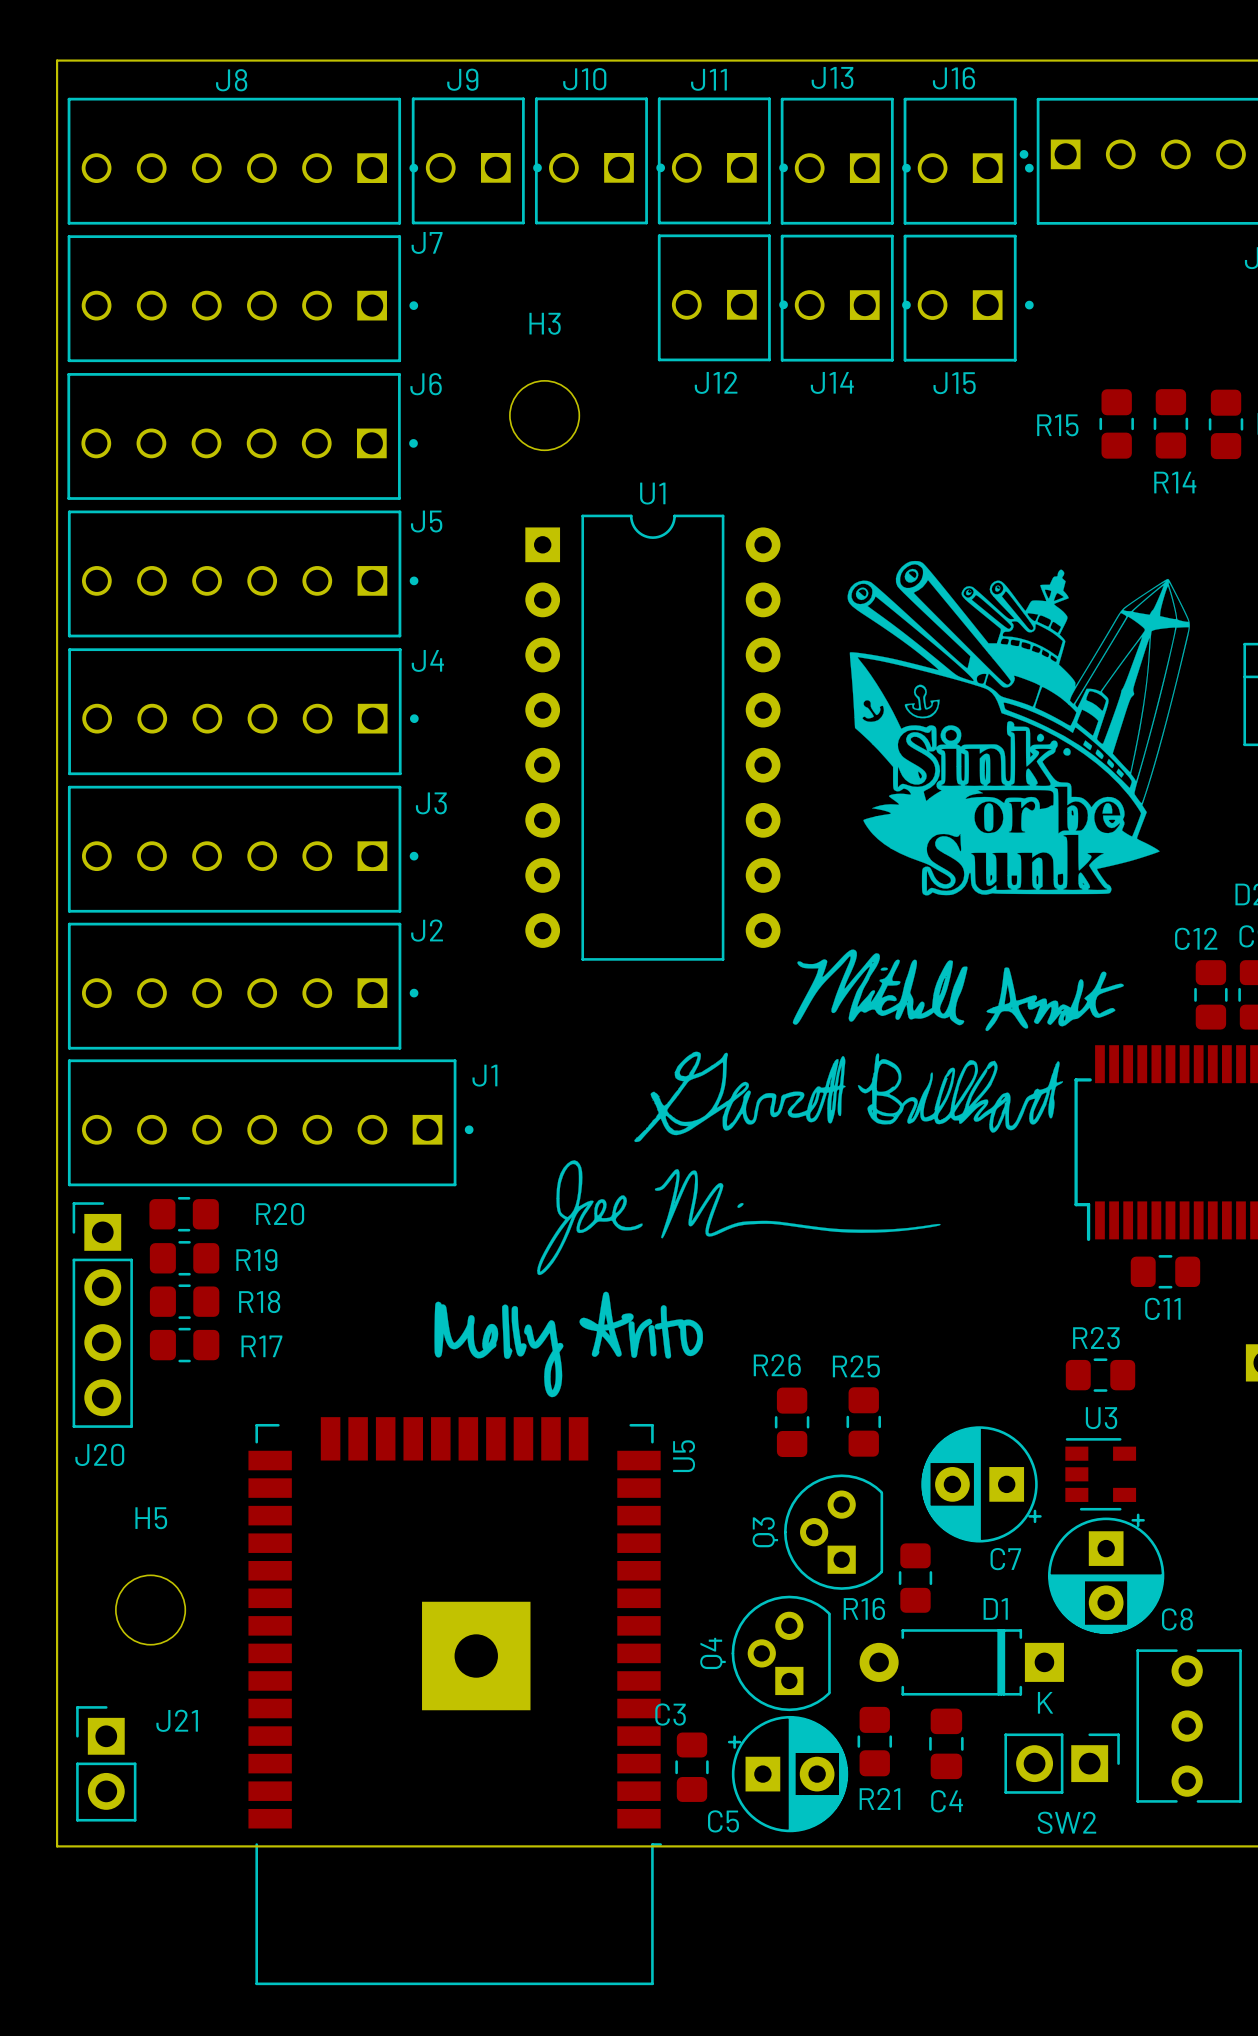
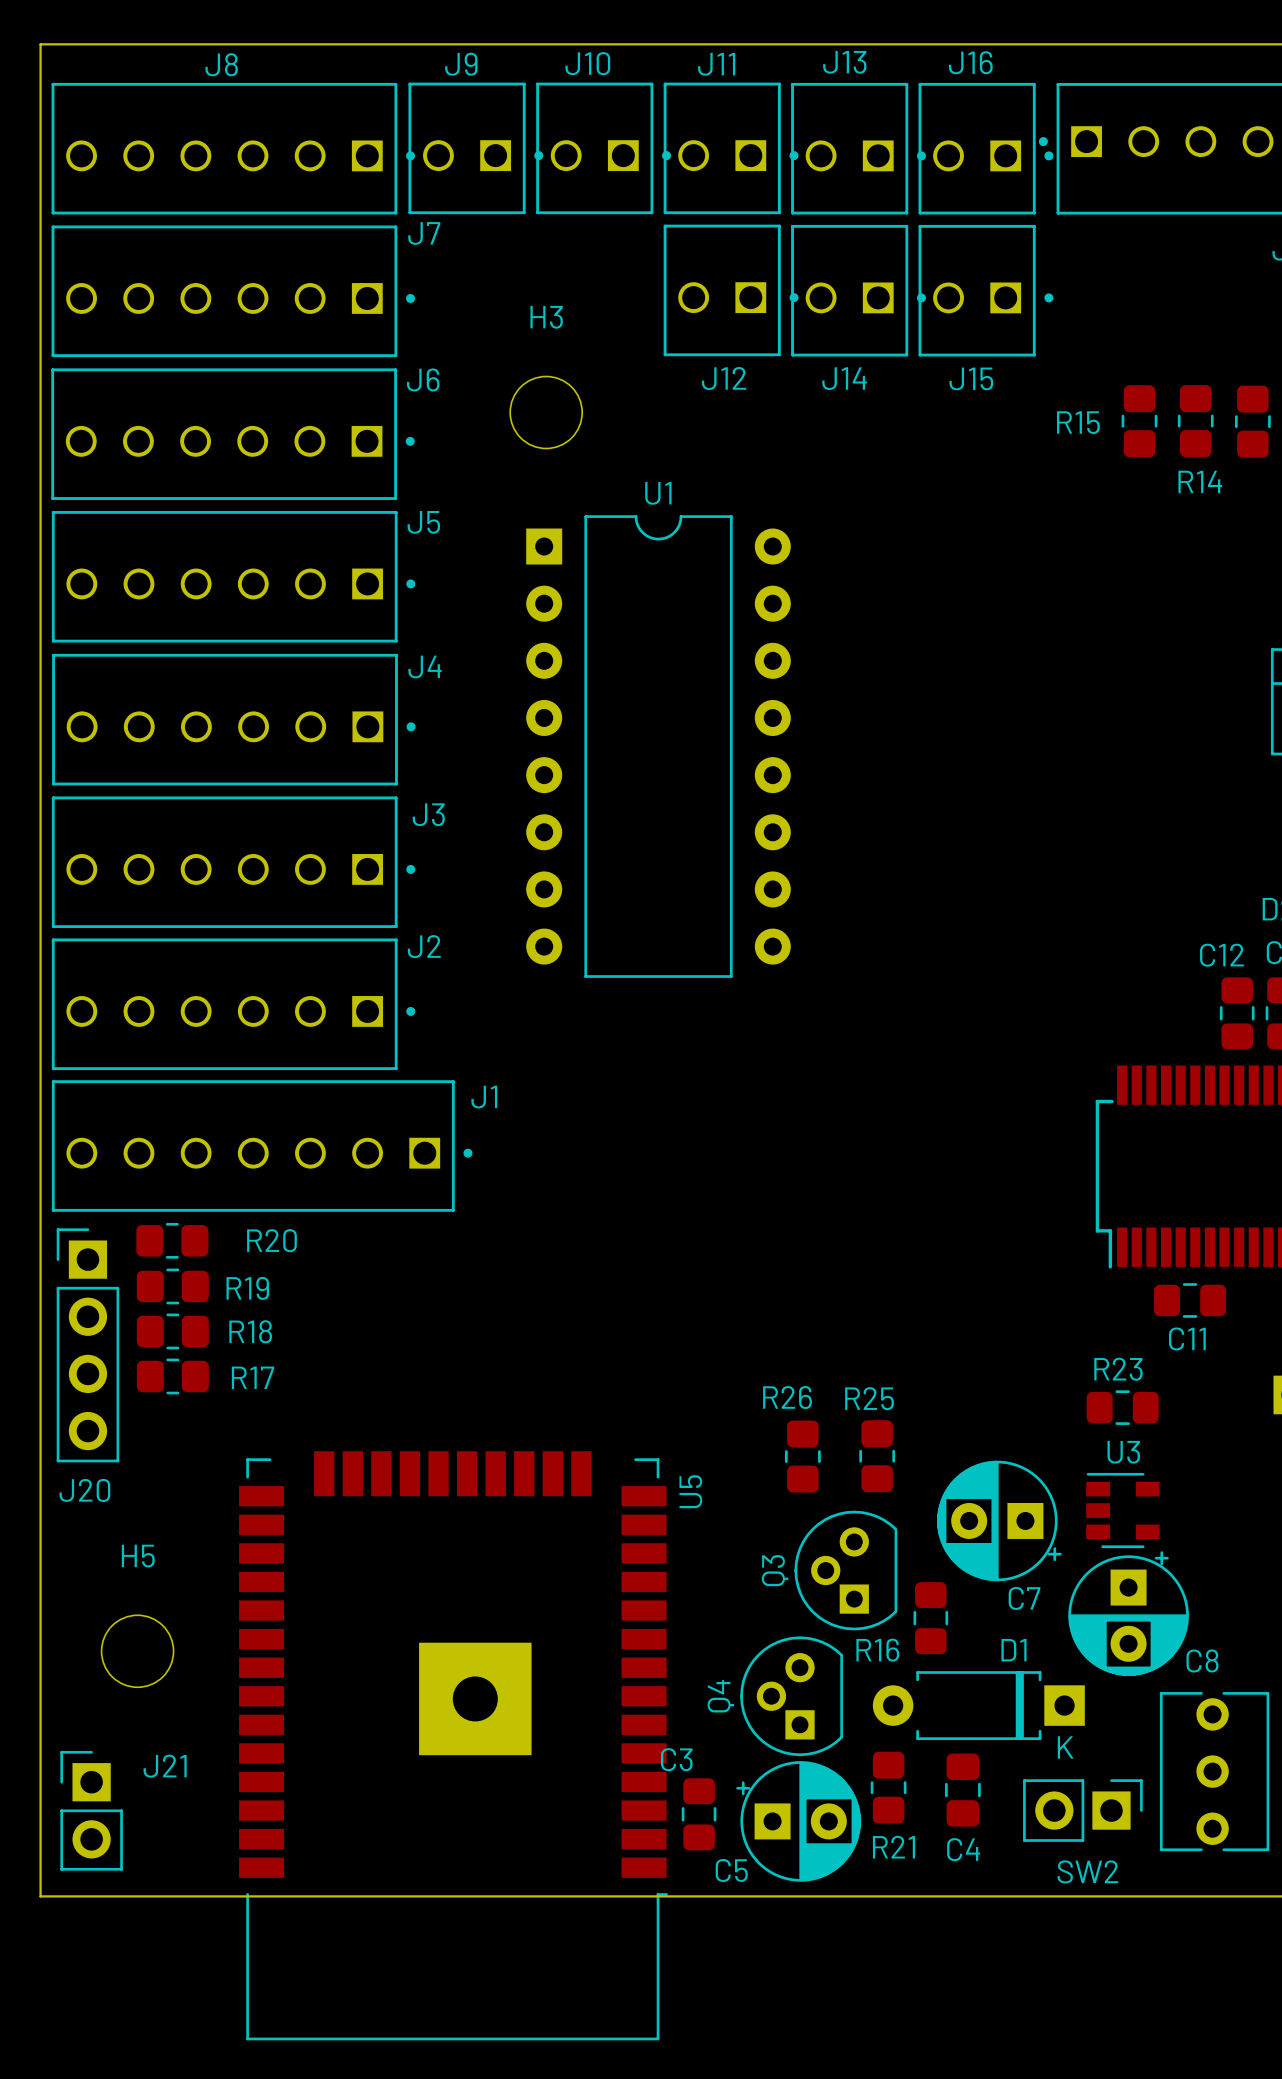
drawing: [847, 560, 1190, 896] -> none
drawing: [434, 949, 1124, 1398] -> none

